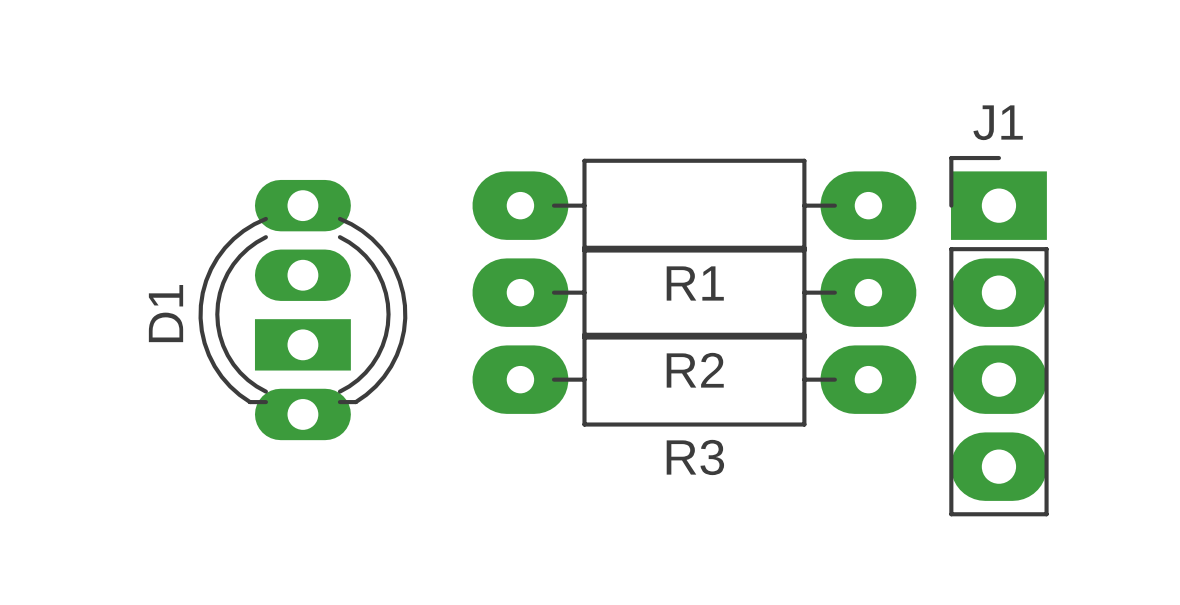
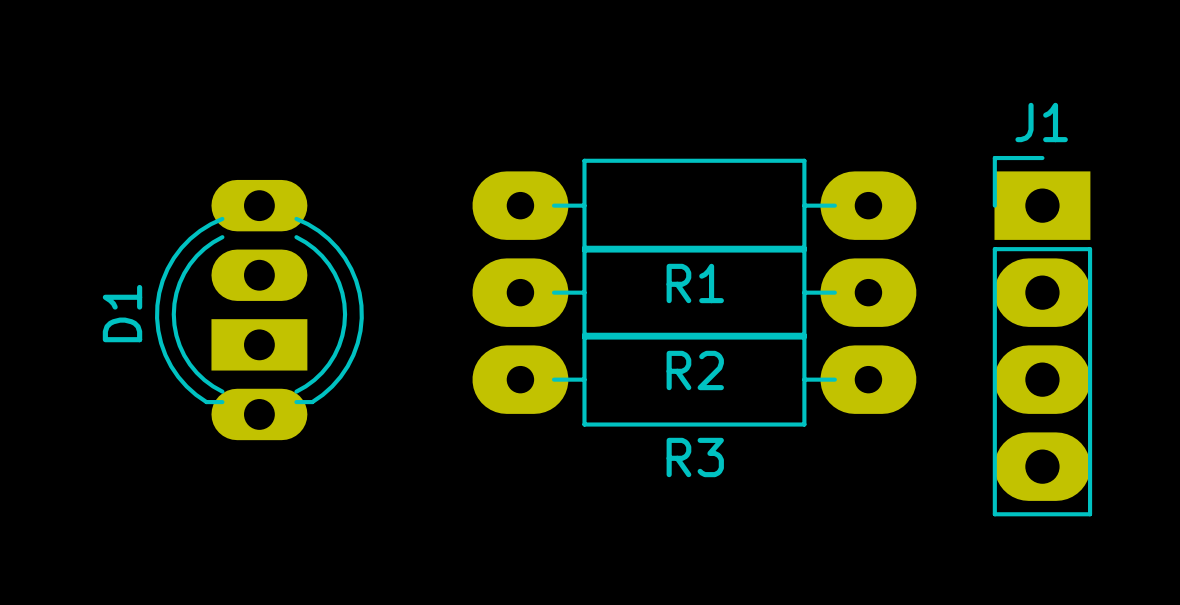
D1 position: (302, 310) -> (259, 310)
J1 position: (998, 336) -> (1042, 336)

